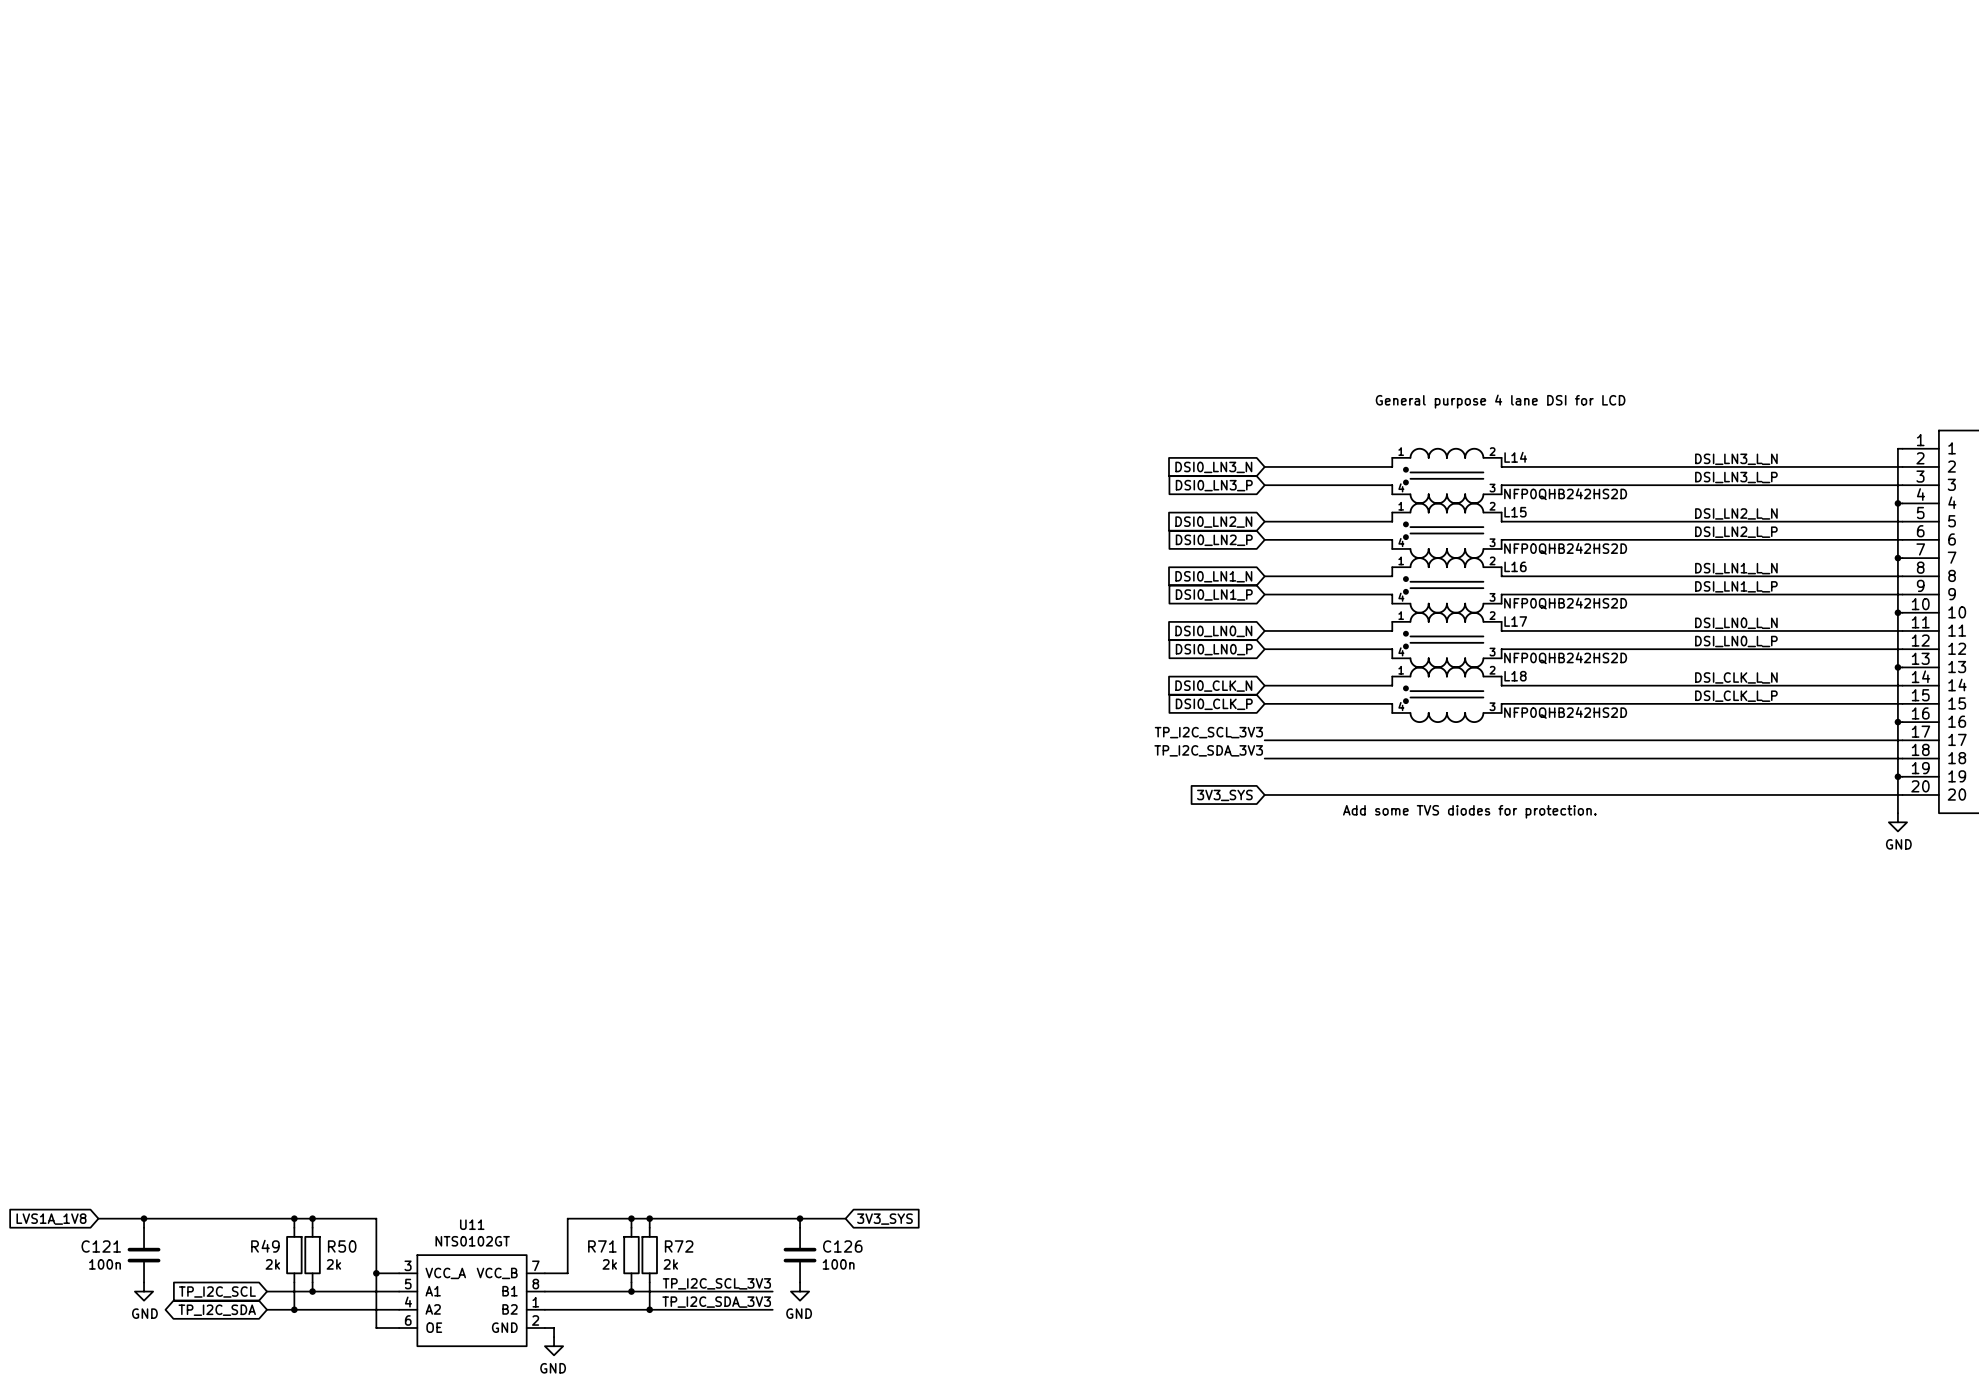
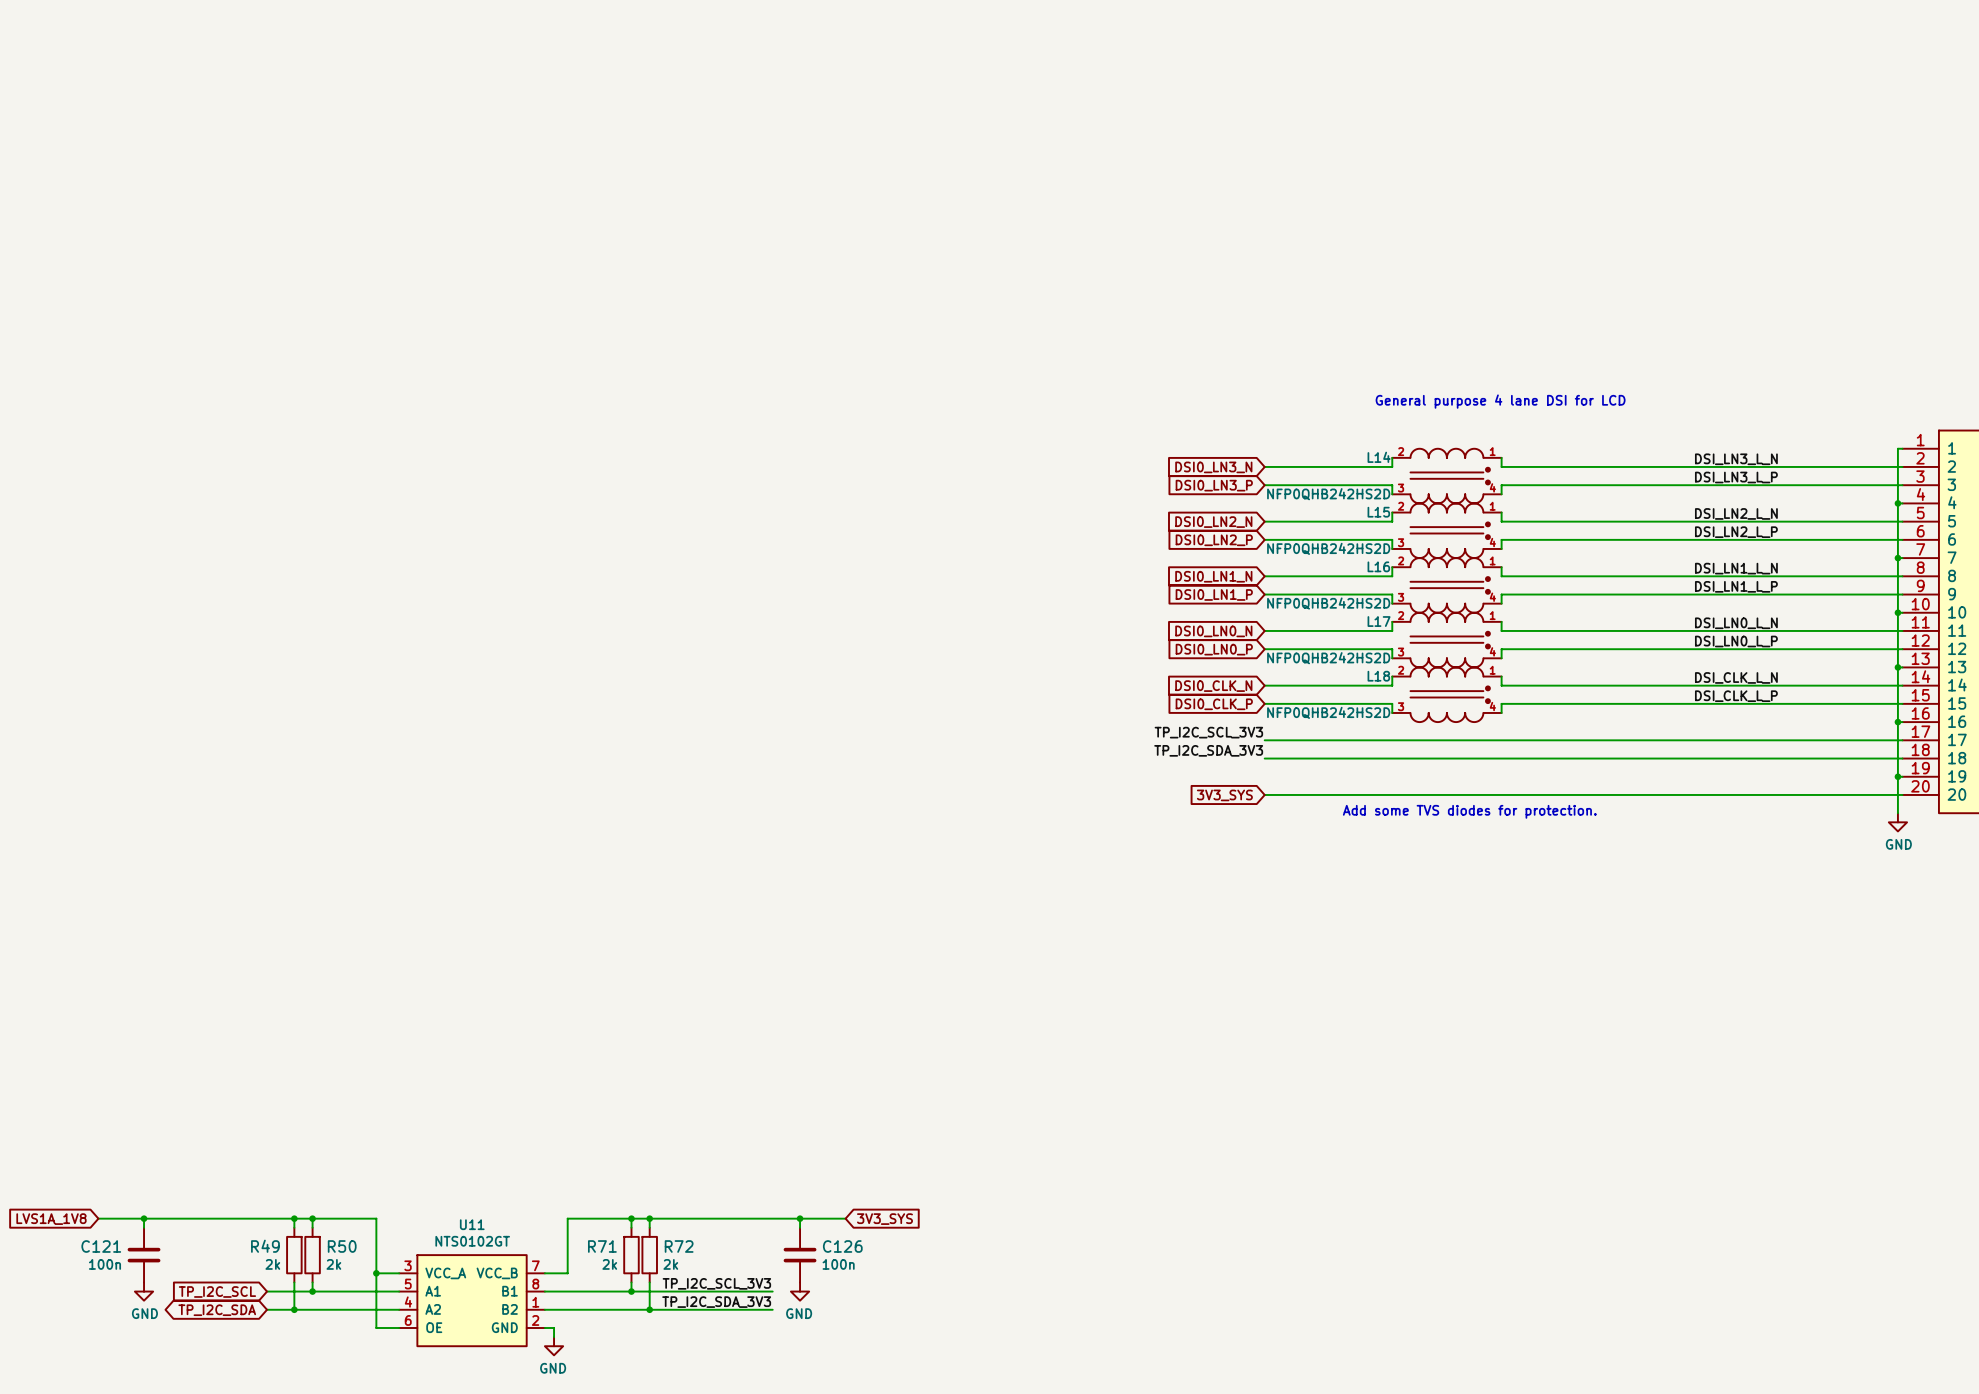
L14 flip: as is (1443, 476) -> left-right (1450, 476)
L15 flip: as is (1443, 530) -> left-right (1450, 530)
L16 flip: as is (1443, 585) -> left-right (1450, 585)
L17 flip: as is (1443, 640) -> left-right (1450, 640)
L18 flip: as is (1443, 694) -> left-right (1450, 694)

